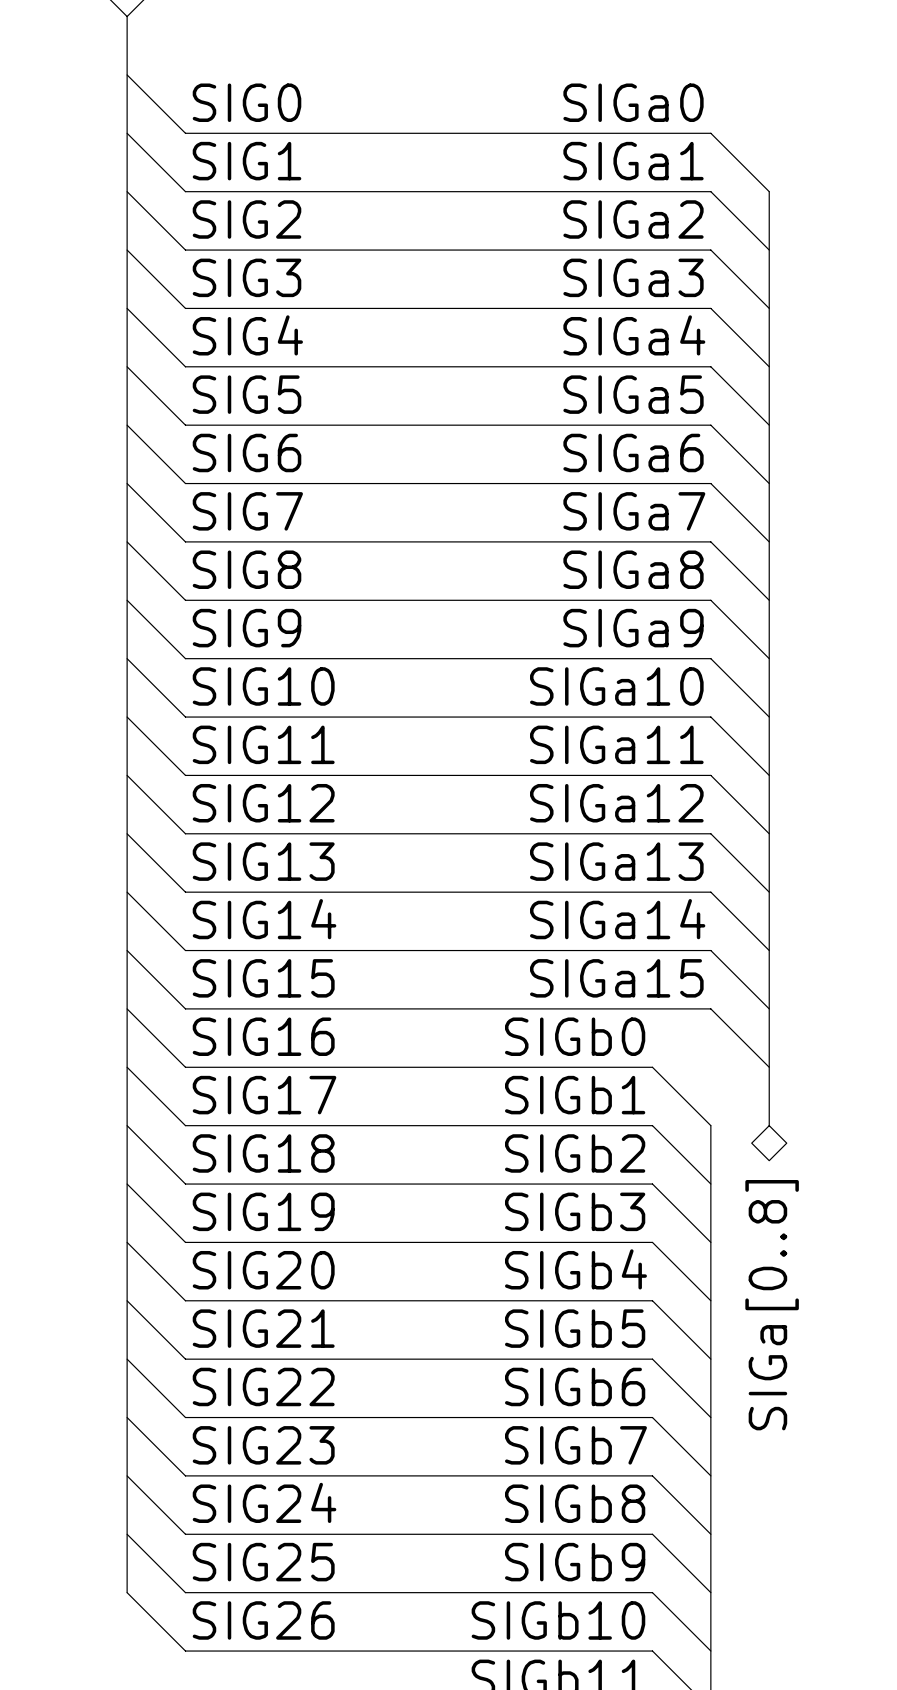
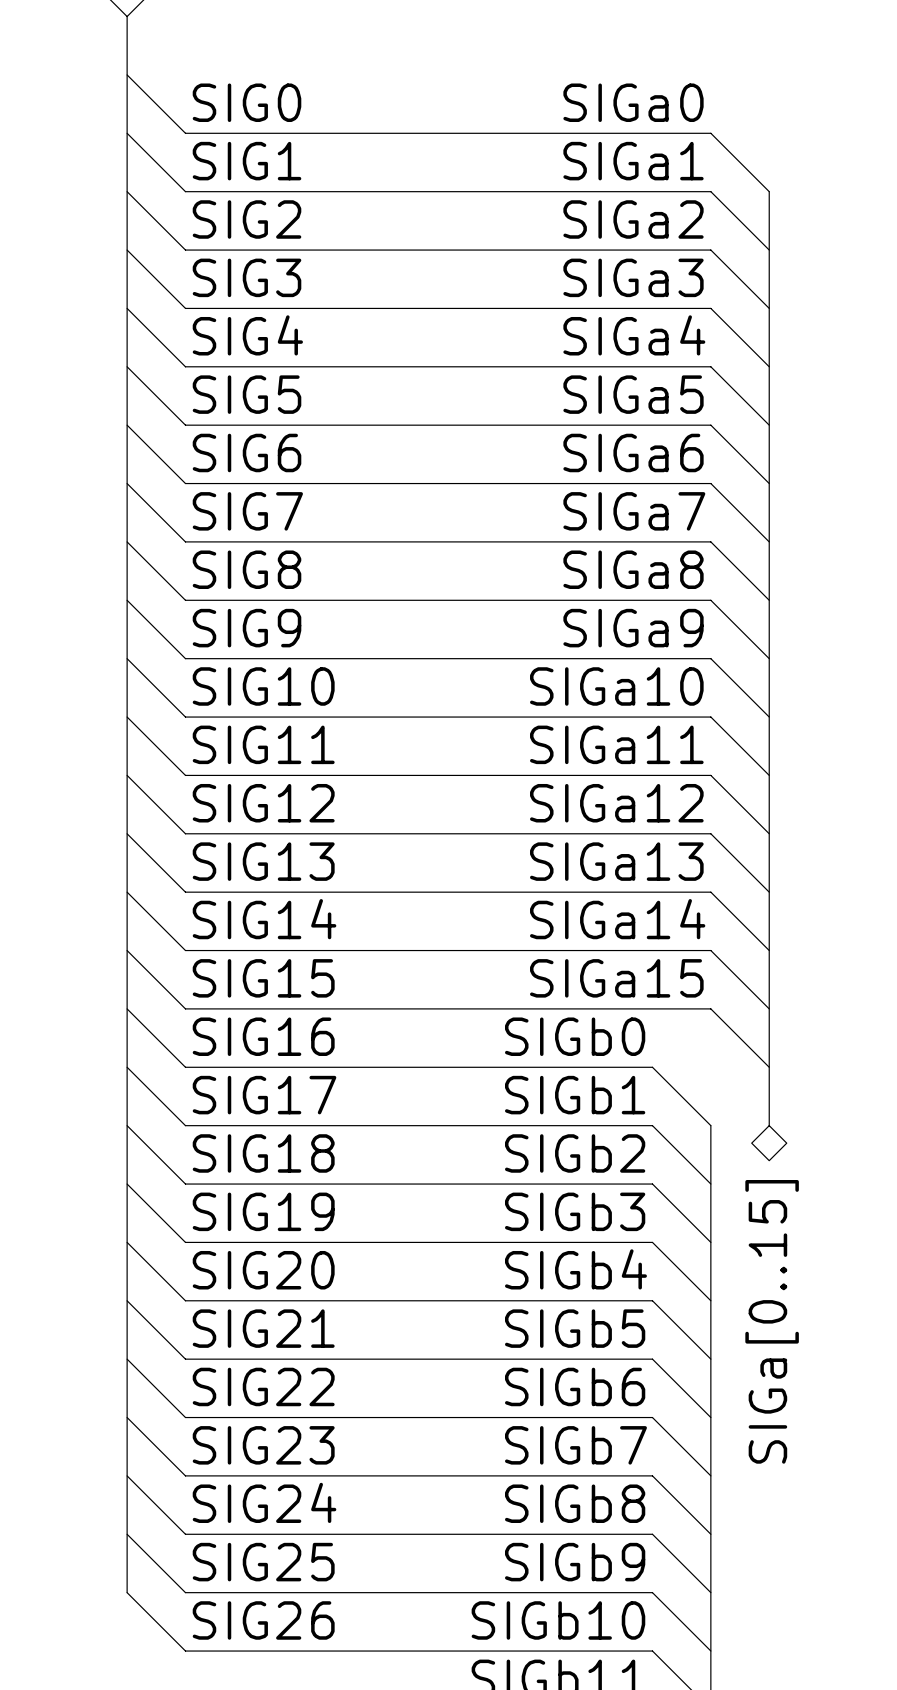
hierarchical label: SIGa[0..8] (772, 1305) -> SIGa[0..15] (772, 1321)

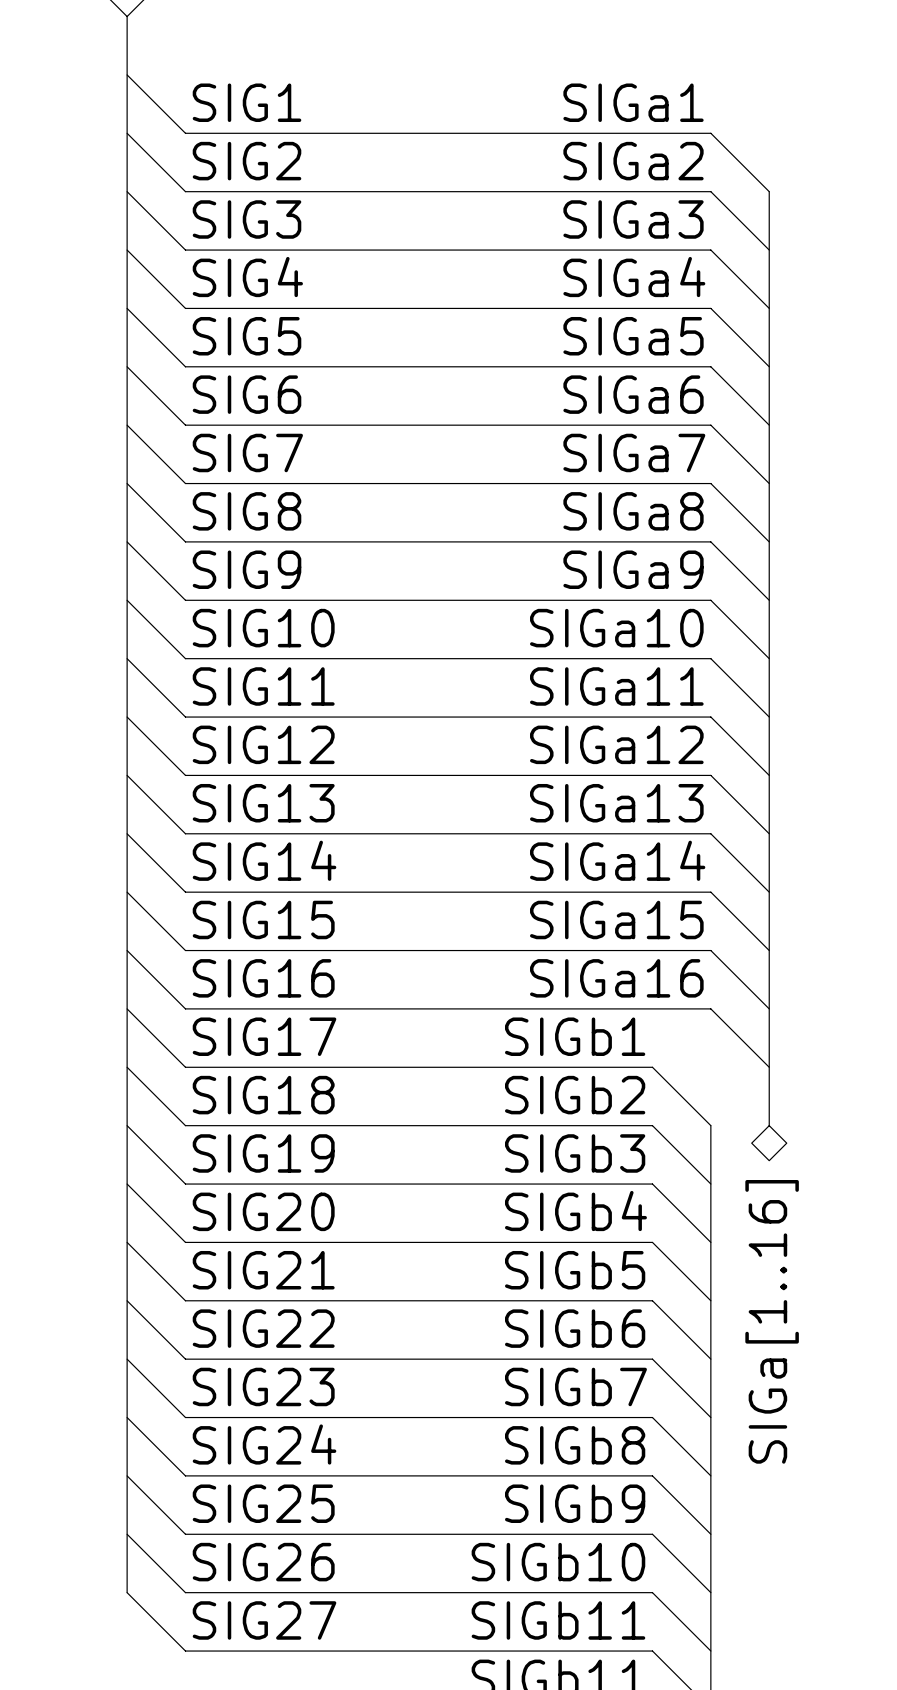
label: SIG0 (247, 102) -> SIG1 (247, 102)
label: SIGa0 (633, 102) -> SIGa1 (633, 102)
label: SIG1 (247, 161) -> SIG2 (247, 161)
label: SIGa1 (633, 161) -> SIGa2 (633, 161)
label: SIG2 (247, 219) -> SIG3 (247, 219)
label: SIGa2 (633, 219) -> SIGa3 (633, 219)
label: SIG3 (247, 277) -> SIG4 (247, 277)
label: SIGa3 (633, 277) -> SIGa4 (634, 277)
label: SIG4 (247, 335) -> SIG5 (247, 336)
label: SIGa4 (634, 335) -> SIGa5 (633, 336)
label: SIG5 (247, 394) -> SIG6 (247, 394)
label: SIGa5 (633, 394) -> SIGa6 (633, 394)
label: SIG6 (247, 452) -> SIG7 (247, 452)
label: SIGa6 (633, 452) -> SIGa7 (634, 452)
label: SIG7 (247, 511) -> SIG8 (247, 511)
label: SIGa7 (634, 511) -> SIGa8 (633, 511)
label: SIG8 (247, 569) -> SIG9 (247, 569)
label: SIGa8 (633, 569) -> SIGa9 (633, 569)
label: SIG9 (247, 628) -> SIG10 (263, 628)
label: SIGa9 (633, 628) -> SIGa10 (616, 628)
label: SIG10 (263, 686) -> SIG11 (263, 686)
label: SIGa10 (616, 686) -> SIGa11 (616, 686)
label: SIG11 (263, 744) -> SIG12 (263, 744)
label: SIGa11 (616, 744) -> SIGa12 (616, 744)
label: SIG12 (263, 803) -> SIG13 (263, 803)
label: SIGa12 (616, 803) -> SIGa13 (616, 803)
label: SIG13 (263, 861) -> SIG14 (264, 860)
label: SIGa13 (616, 861) -> SIGa14 (617, 860)
label: SIG14 (264, 919) -> SIG15 (263, 919)
label: SIGa14 (617, 919) -> SIGa15 (616, 919)
label: SIG15 (263, 978) -> SIG16 (263, 978)
label: SIGa15 (616, 978) -> SIGa16 (616, 978)
label: SIG16 (263, 1036) -> SIG17 (264, 1036)
label: SIGb0 (575, 1036) -> SIGb1 (575, 1036)
label: SIG17 (264, 1095) -> SIG18 (263, 1095)
label: SIGb1 (575, 1095) -> SIGb2 (575, 1095)
label: SIG18 (263, 1153) -> SIG19 (263, 1153)
label: SIGb2 (575, 1153) -> SIGb3 (575, 1153)
label: SIG19 (263, 1211) -> SIG20 (263, 1211)
label: SIGb3 (575, 1211) -> SIGb4 (575, 1211)
label: SIGb4 (575, 1269) -> SIGb5 (575, 1270)
label: SIG20 (263, 1270) -> SIG21 (263, 1270)
hierarchical label: SIGa[0..15] (772, 1321) -> SIGa[1..16] (772, 1321)
label: SIG21 (263, 1328) -> SIG22 (263, 1328)
label: SIGb5 (575, 1328) -> SIGb6 (575, 1328)
label: SIG22 (263, 1386) -> SIG23 (263, 1386)
label: SIGb6 (575, 1386) -> SIGb7 (575, 1386)
label: SIG23 (263, 1445) -> SIG24 (264, 1444)
label: SIGb7 (575, 1445) -> SIGb8 (575, 1445)
label: SIG24 (264, 1502) -> SIG25 (263, 1503)
label: SIGb8 (575, 1503) -> SIGb9 (575, 1503)
label: SIG25 (263, 1562) -> SIG26 (263, 1562)
label: SIGb9 (575, 1562) -> SIGb10 (558, 1562)
label: SIG26 (263, 1620) -> SIG27 (264, 1620)
label: SIGb10 (558, 1620) -> SIGb11 (558, 1620)

